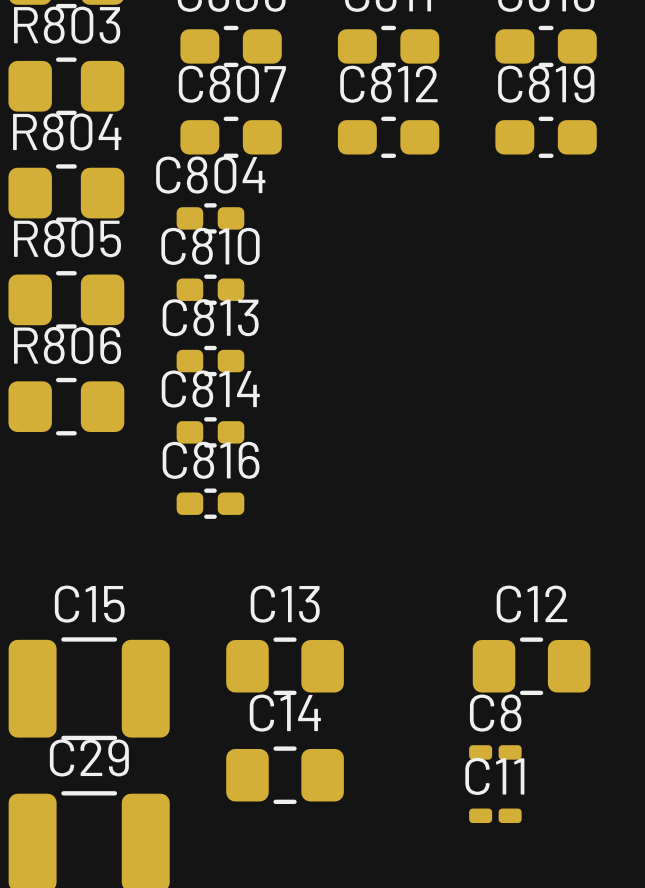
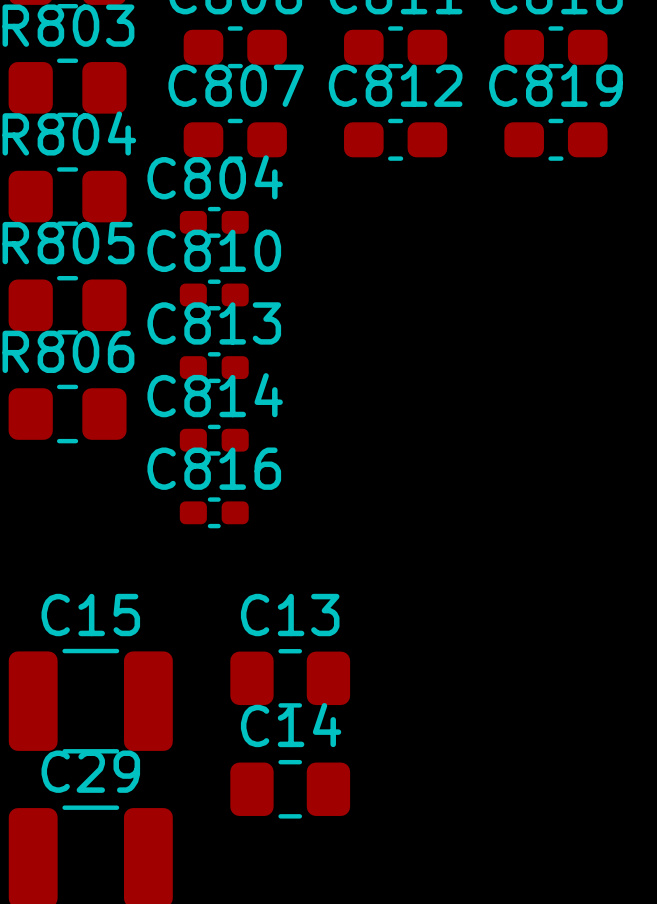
C12: (531, 666) -> none
C8: (495, 752) -> none
C11: (495, 815) -> none

